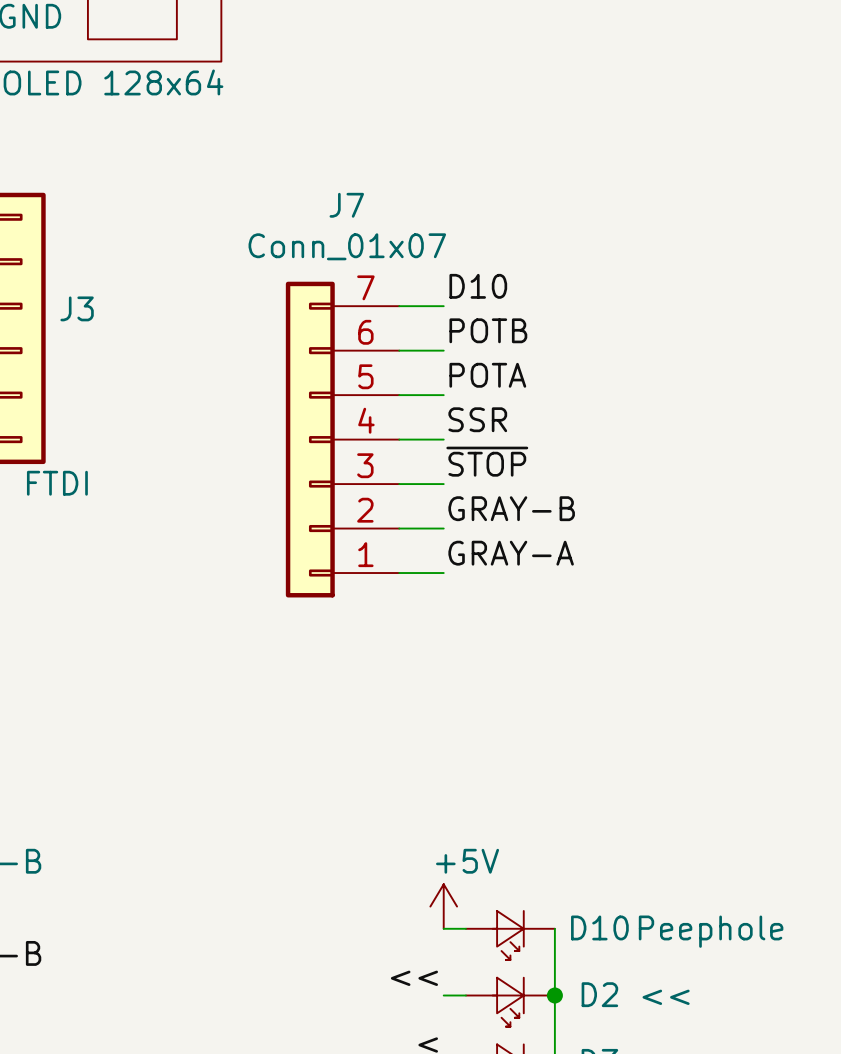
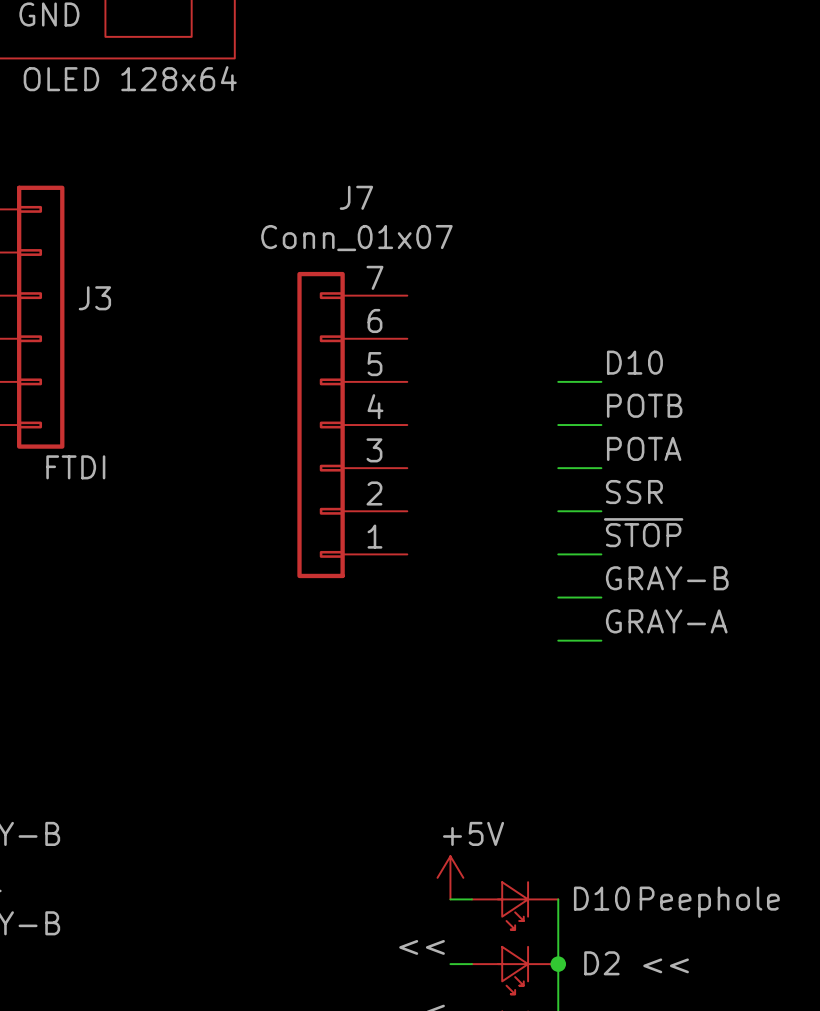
label position: D10 (478, 286) -> D10 (634, 362)
wire: (399, 306) (443, 306) -> (558, 381) (601, 381)
label position: POTB (488, 330) -> POTB (644, 405)
wire: (399, 350) (443, 350) -> (558, 425) (601, 425)
label position: POTA (487, 375) -> POTA (644, 448)
wire: (399, 395) (443, 395) -> (558, 468) (601, 468)
label position: SSR (477, 419) -> SSR (634, 492)
wire: (399, 439) (443, 439) -> (558, 511) (601, 511)
label position: ~{STOP} (487, 461) -> ~{STOP} (643, 532)
wire: (399, 484) (443, 484) -> (558, 554) (601, 554)
label position: GRAY-B (511, 508) -> GRAY-B (667, 578)
wire: (399, 528) (443, 528) -> (558, 597) (601, 597)
label position: GRAY-A (511, 553) -> GRAY-A (666, 621)
wire: (399, 573) (443, 573) -> (558, 640) (601, 640)

